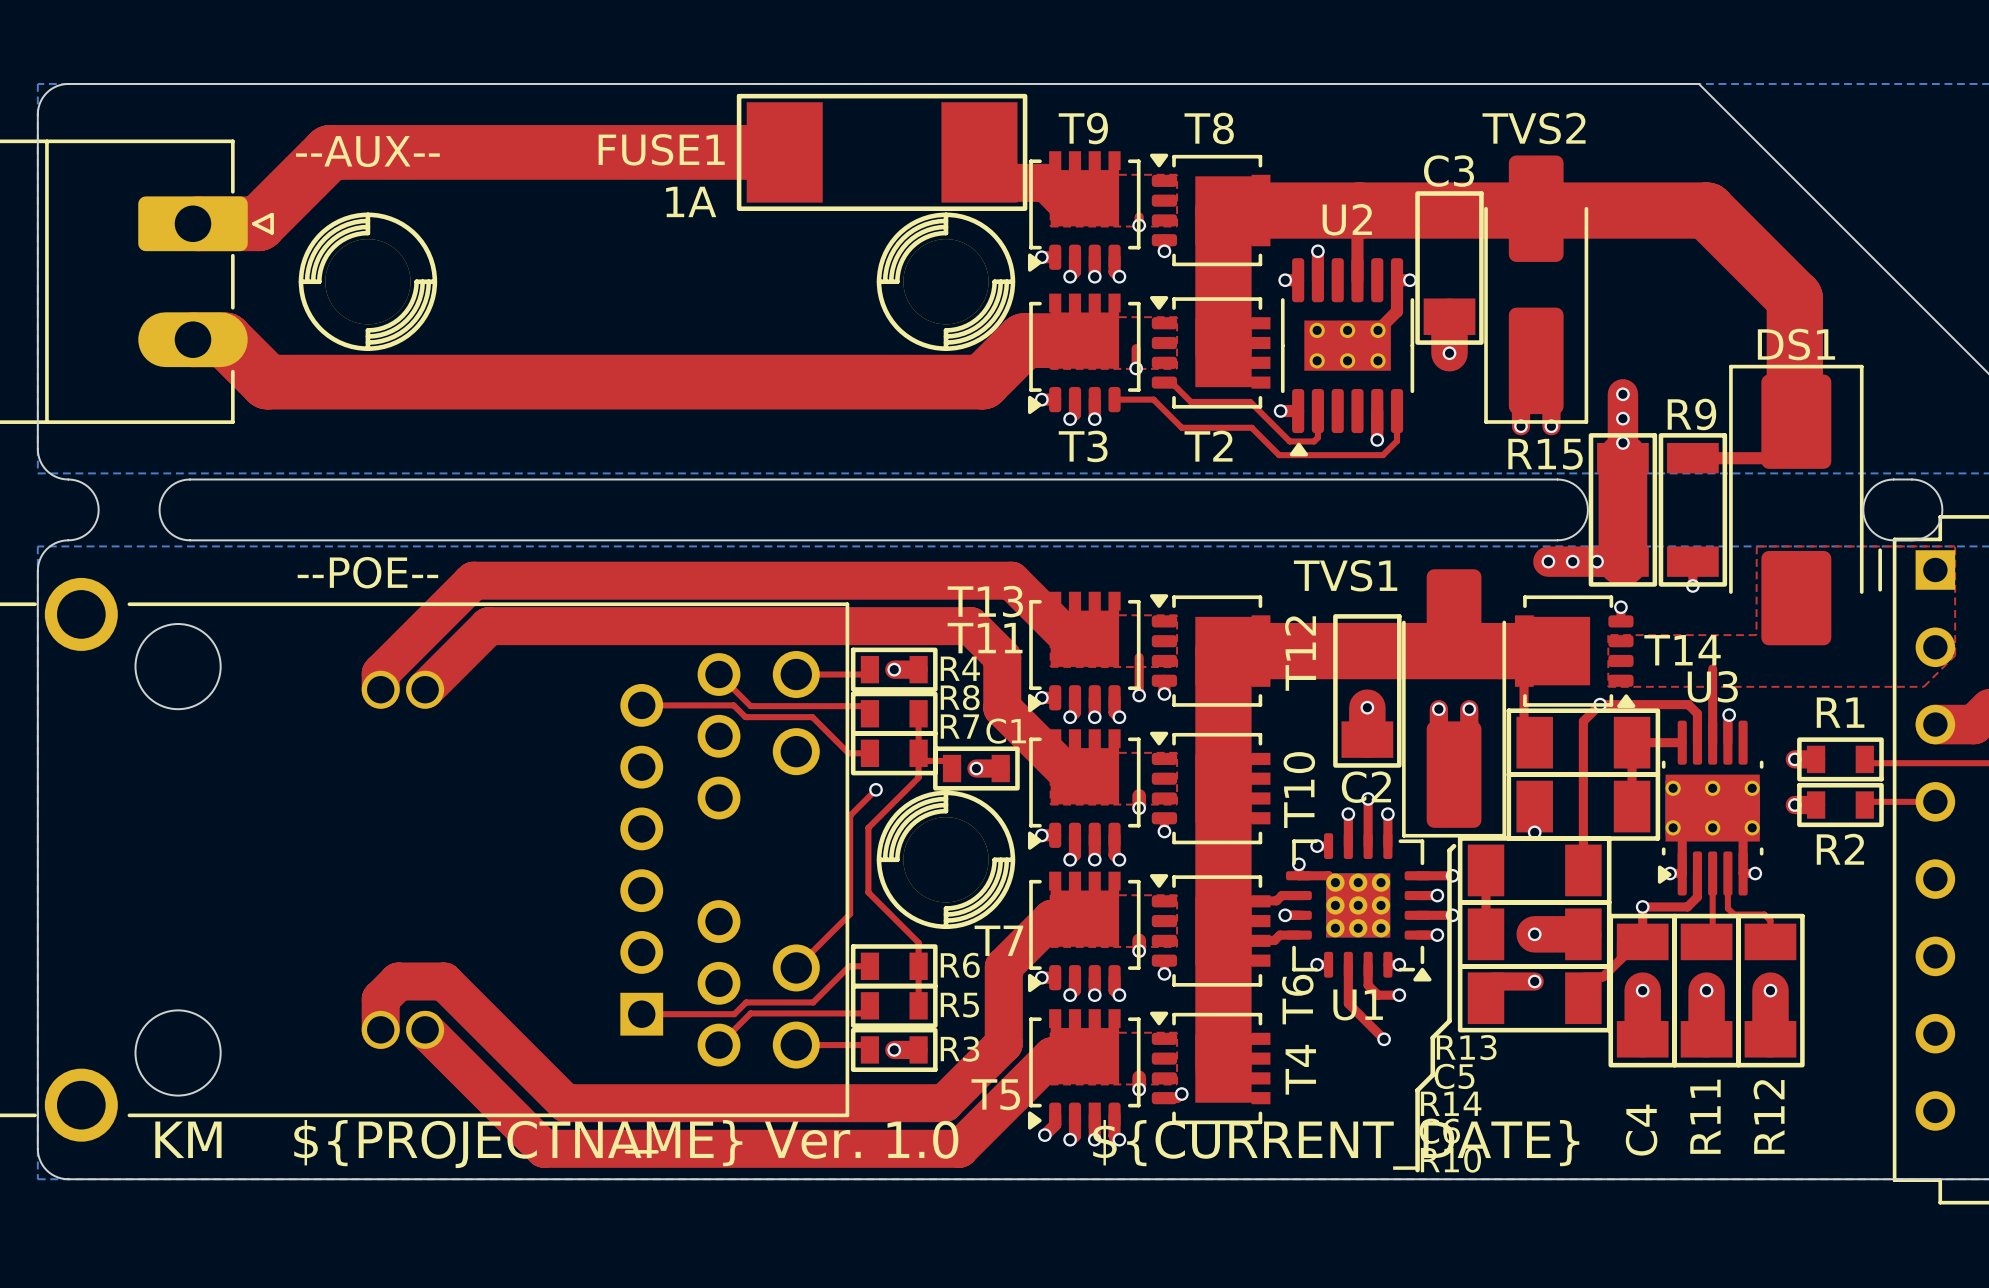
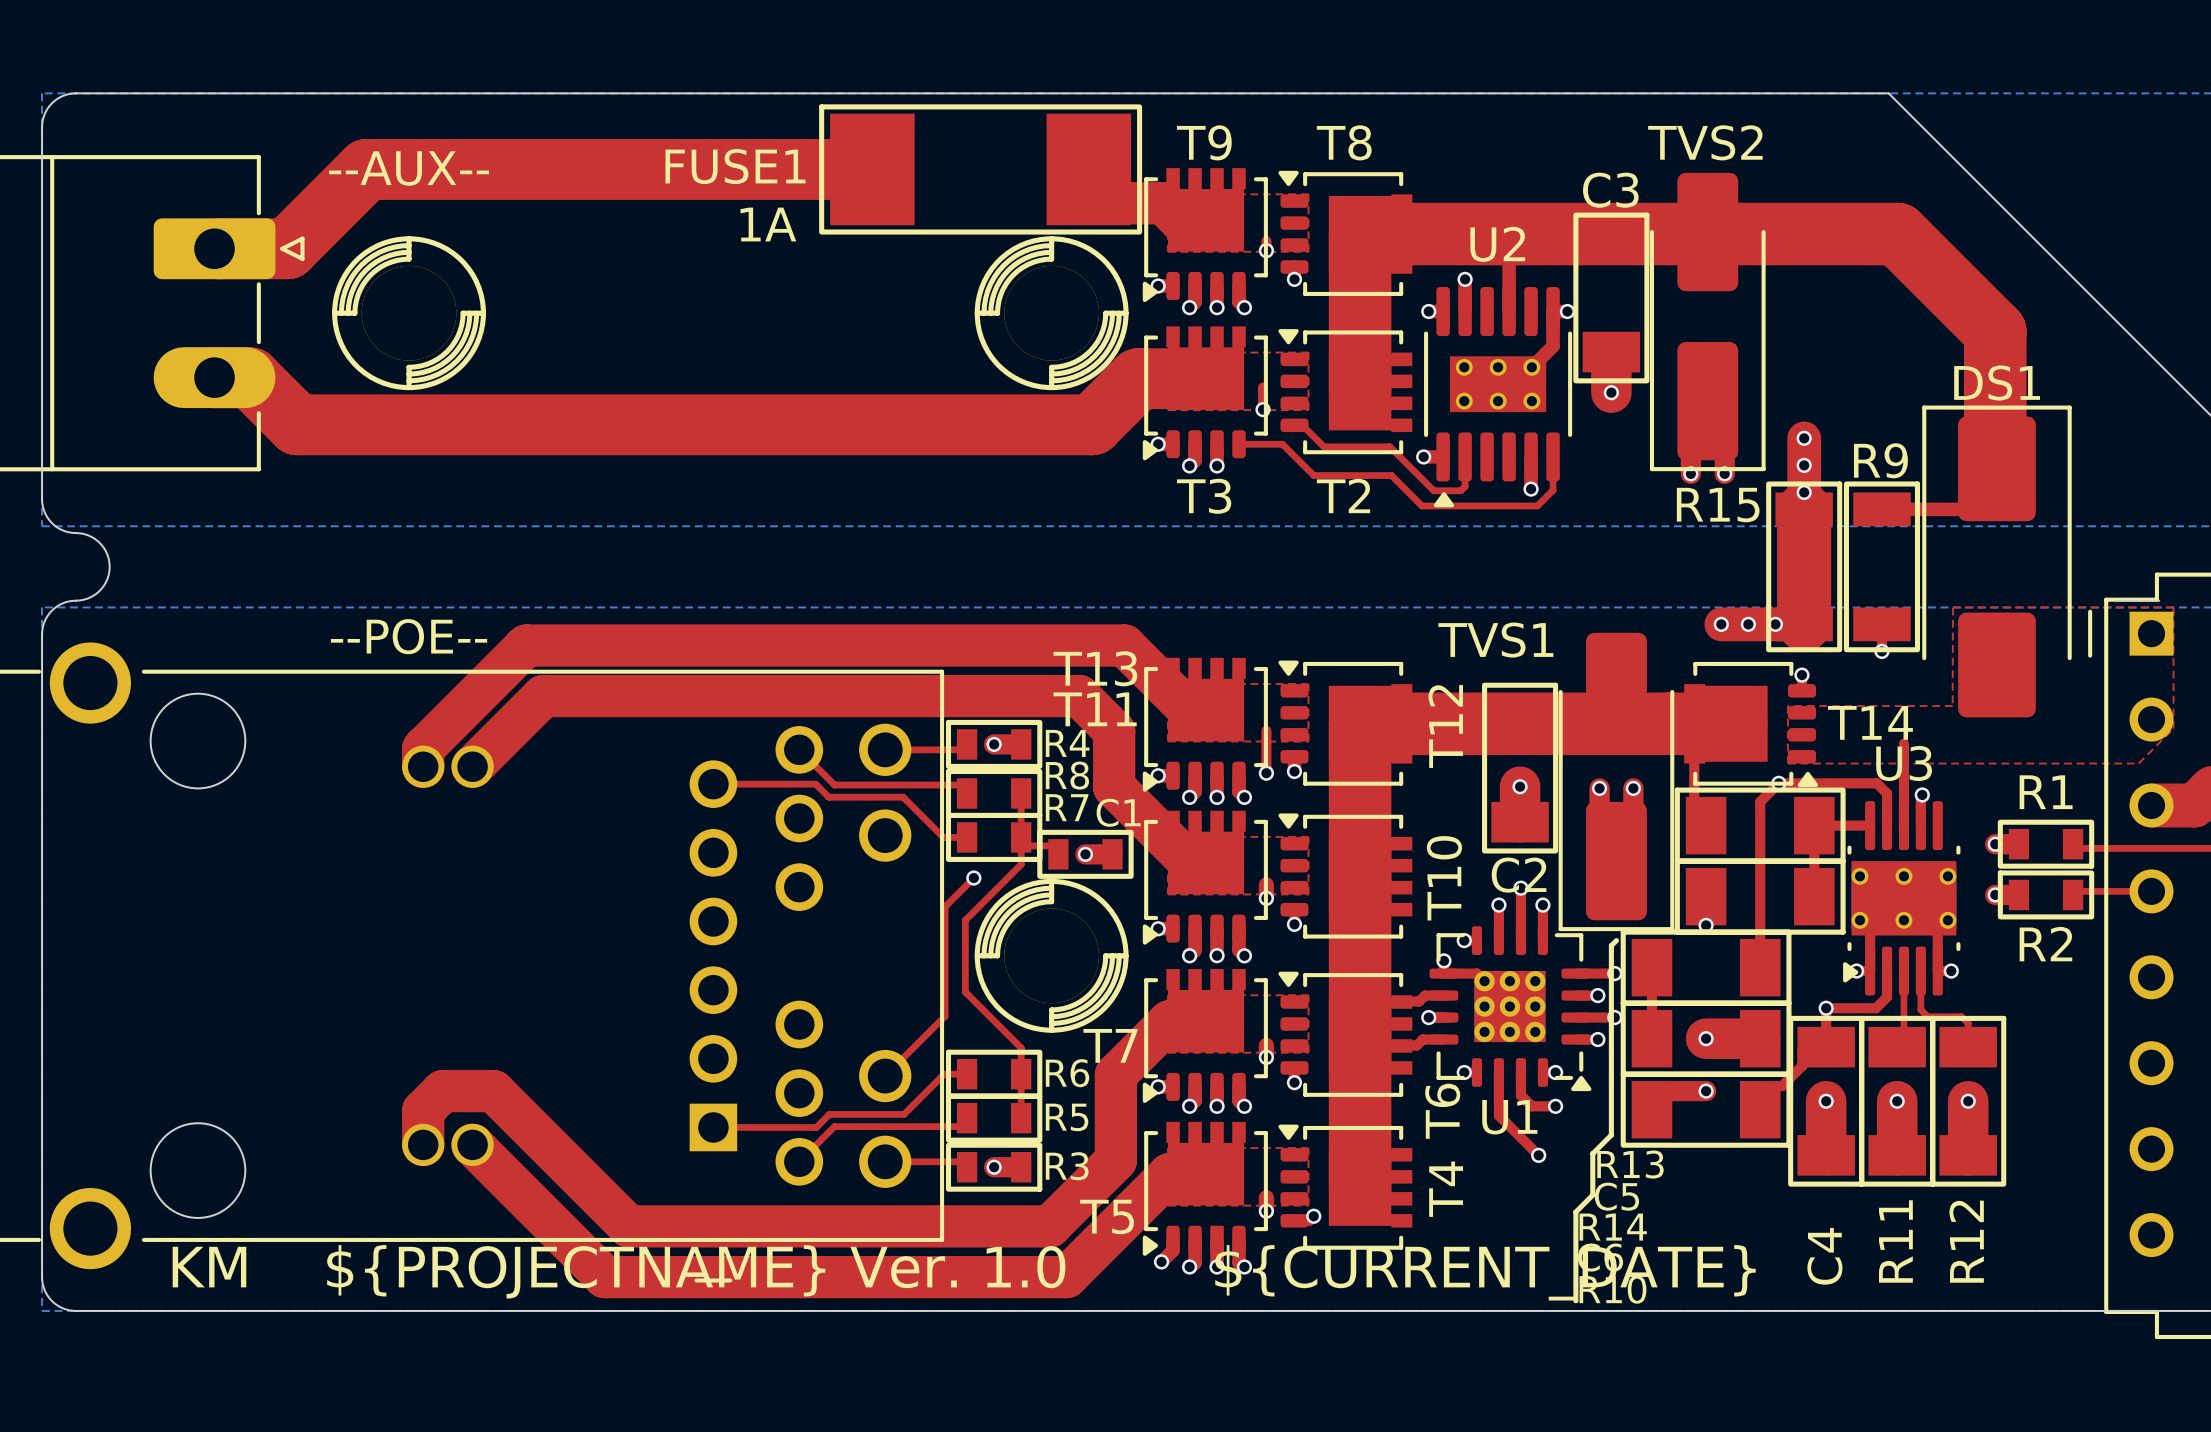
board edge: (189, 479) (1557, 479) (1569, 481) (1579, 488) (1585, 498) (1587, 509) (1585, 521) (1579, 531) (1569, 538) (1557, 540) (189, 540) (178, 538) (168, 531) (161, 521) (159, 509) (161, 498) (168, 488) (178, 481) (189, 479) -> none
board edge: (1902, 540) (1889, 540) (1878, 536) (1869, 528) (1864, 517) (1863, 505) (1867, 494) (1875, 485) (1885, 480) (1919, 480) (1930, 485) (1940, 498) (1942, 509) (1938, 525) (1927, 536) (1911, 540) -> (2159, 600) (2125, 600)

